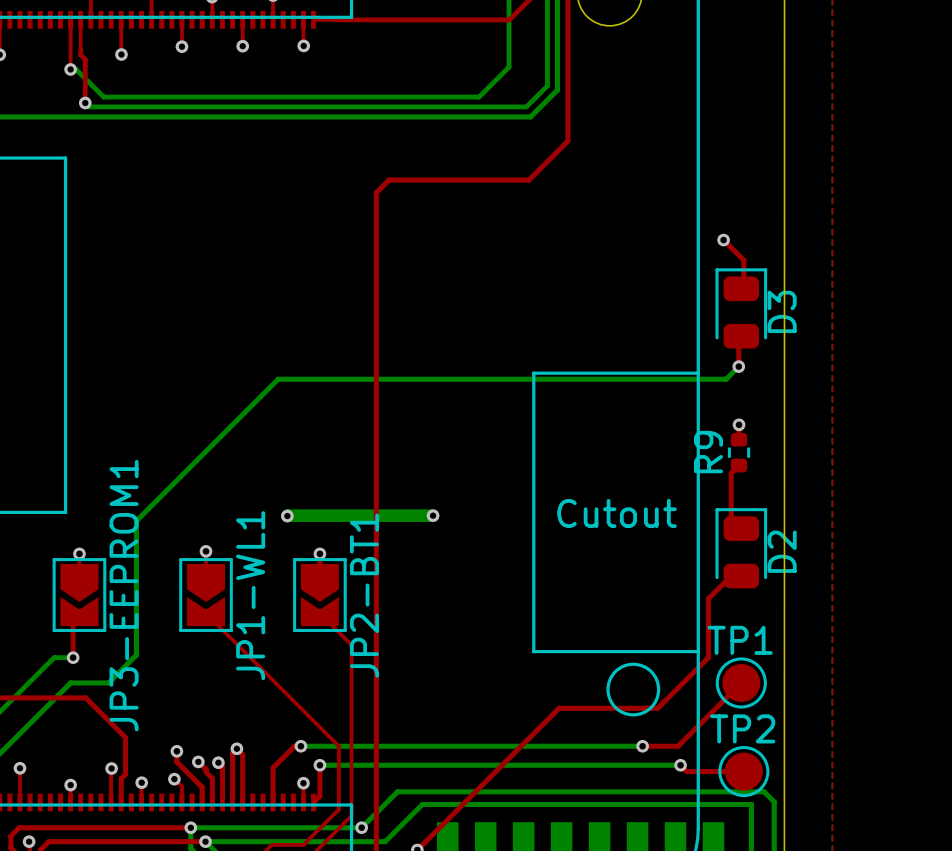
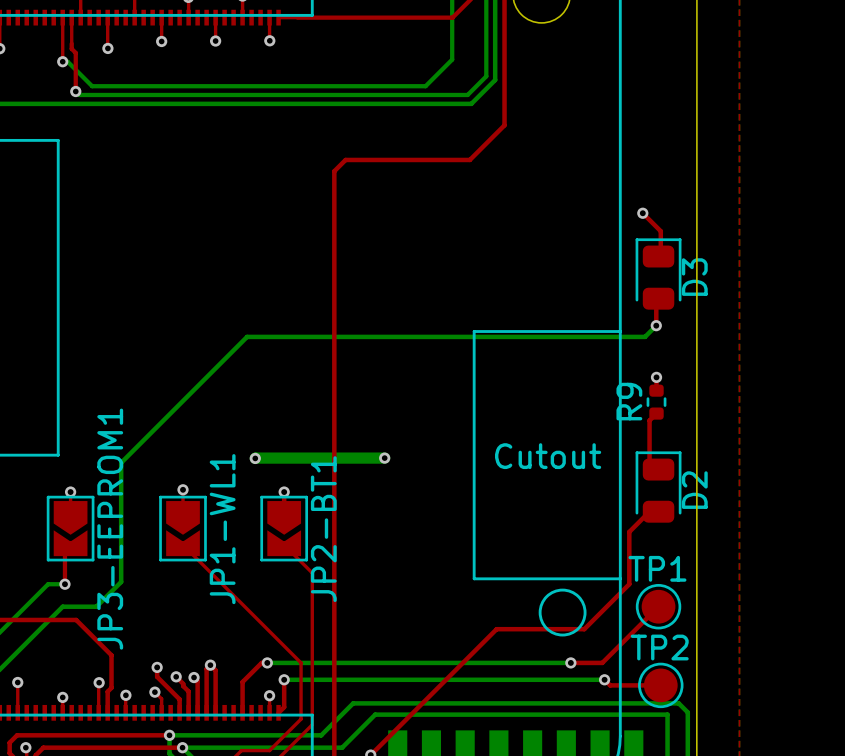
via: (361, 827) -> none

